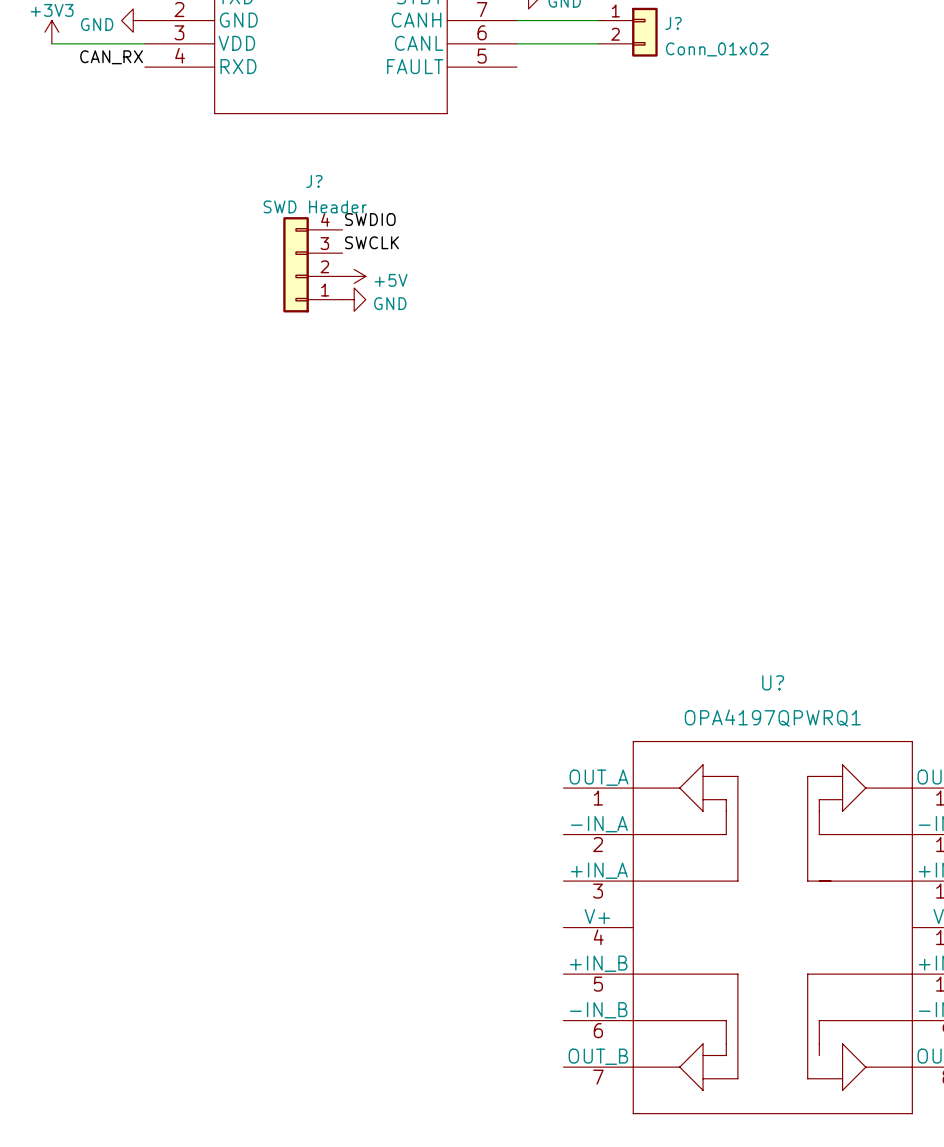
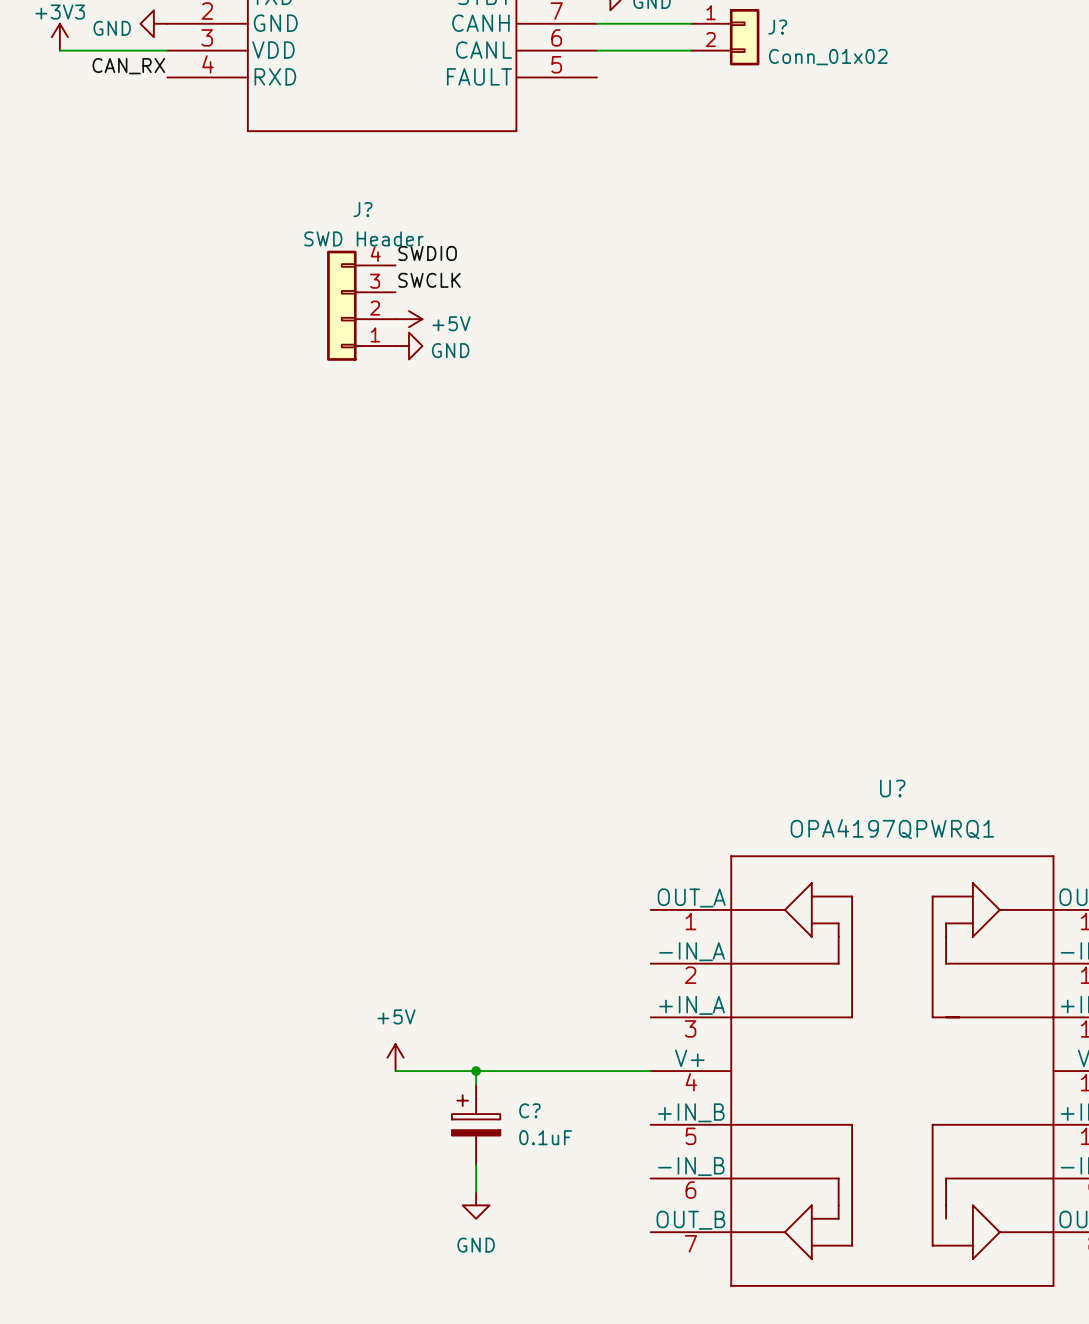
power symbol: none -> +5V (395, 1057)
wire: none -> (395, 1071) (650, 1071)
wire: none -> (476, 1071) (476, 1084)
junction: none -> (476, 1071)
C?: none -> 0.1uF (476, 1124)
wire: none -> (476, 1165) (476, 1191)
power symbol: none -> GND (476, 1205)

